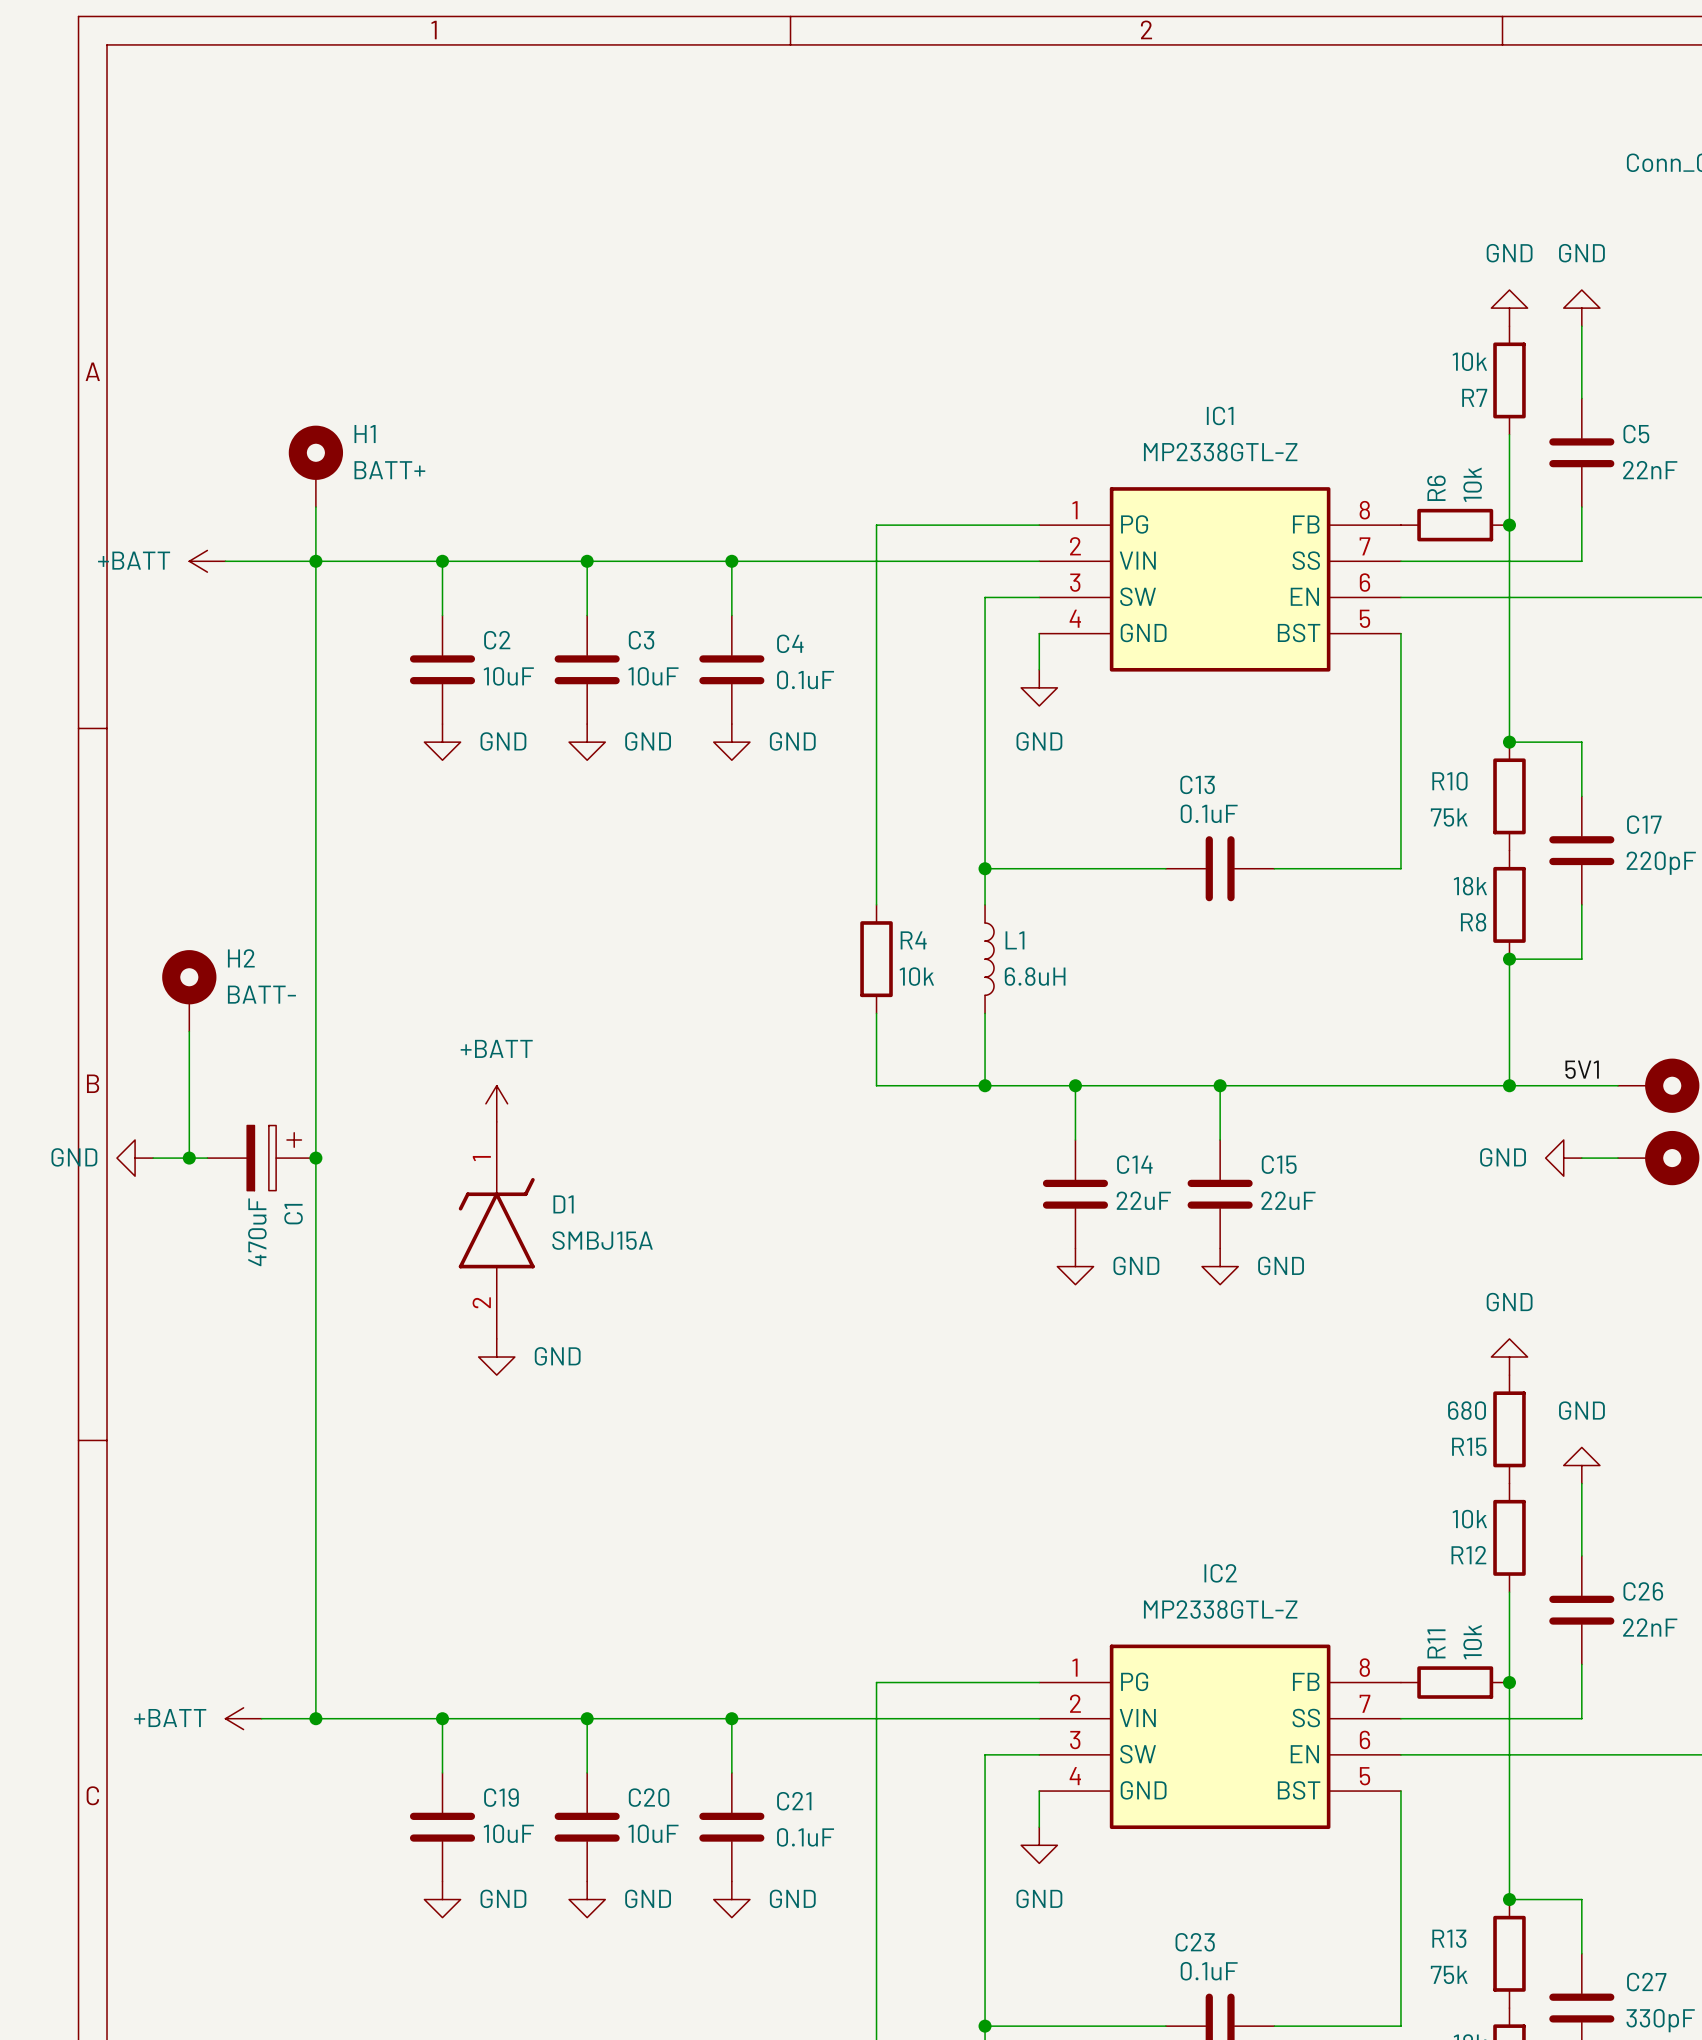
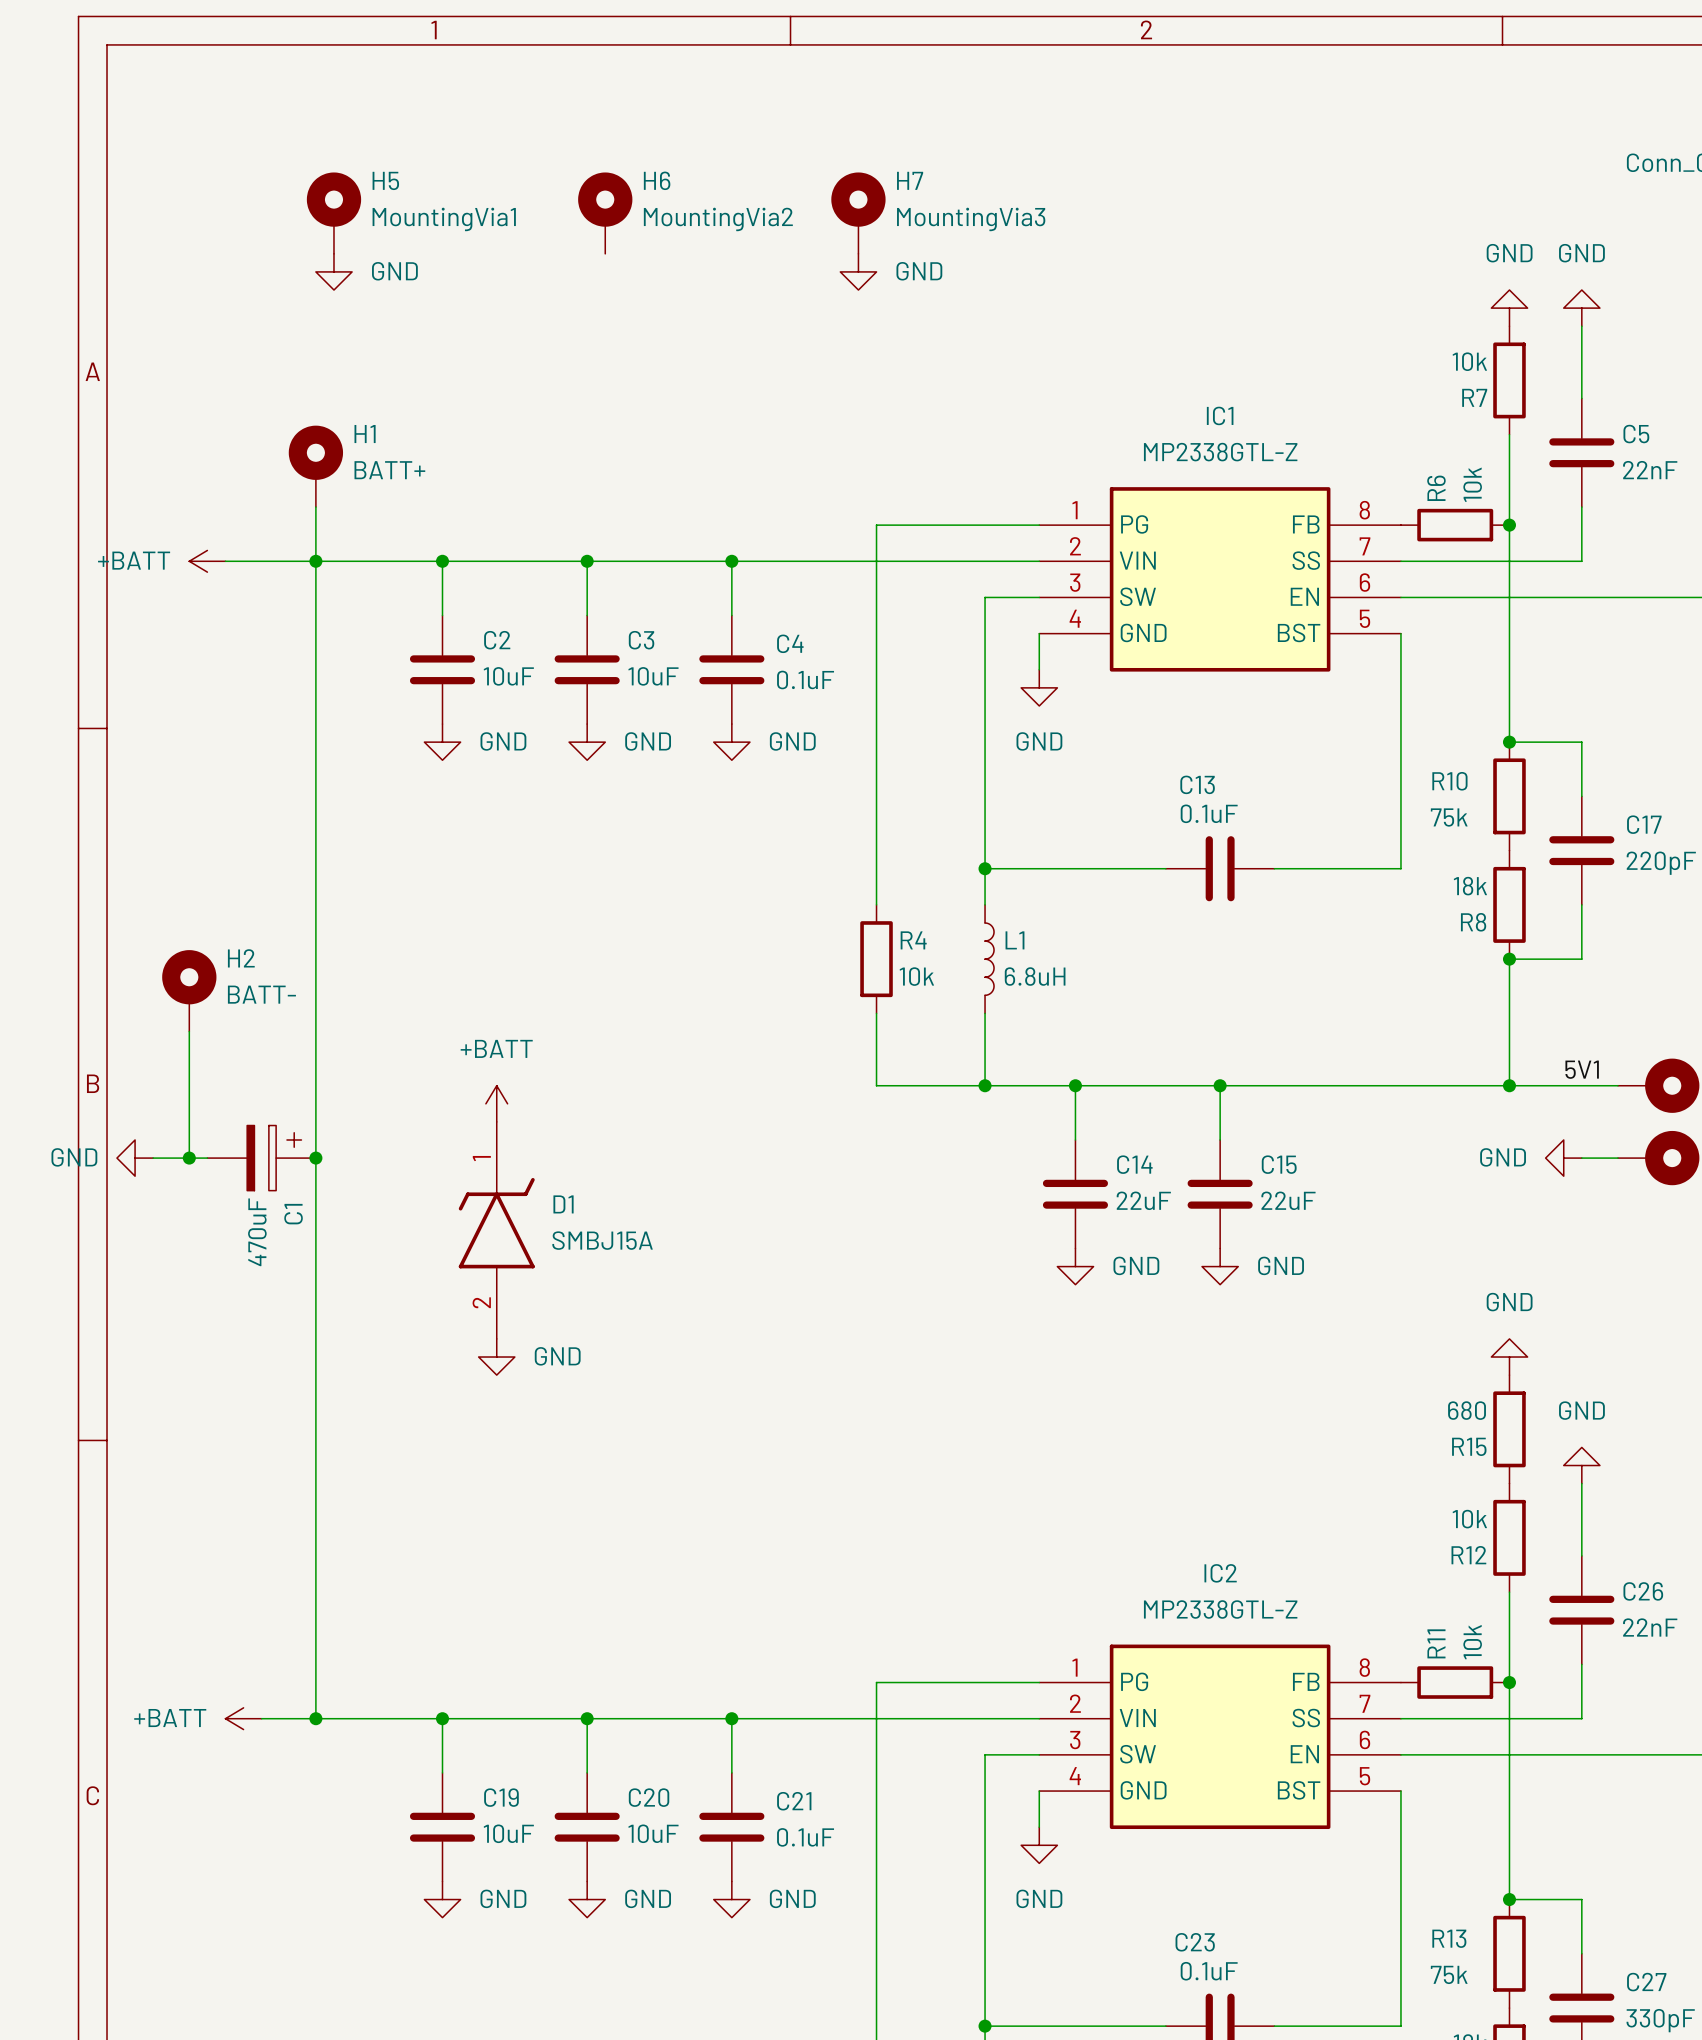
H5: none -> MountingVia1 (333, 213)
H6: none -> MountingVia2 (605, 213)
H7: none -> MountingVia3 (858, 213)
power symbol: none -> GND (333, 271)
power symbol: none -> GND (858, 271)

